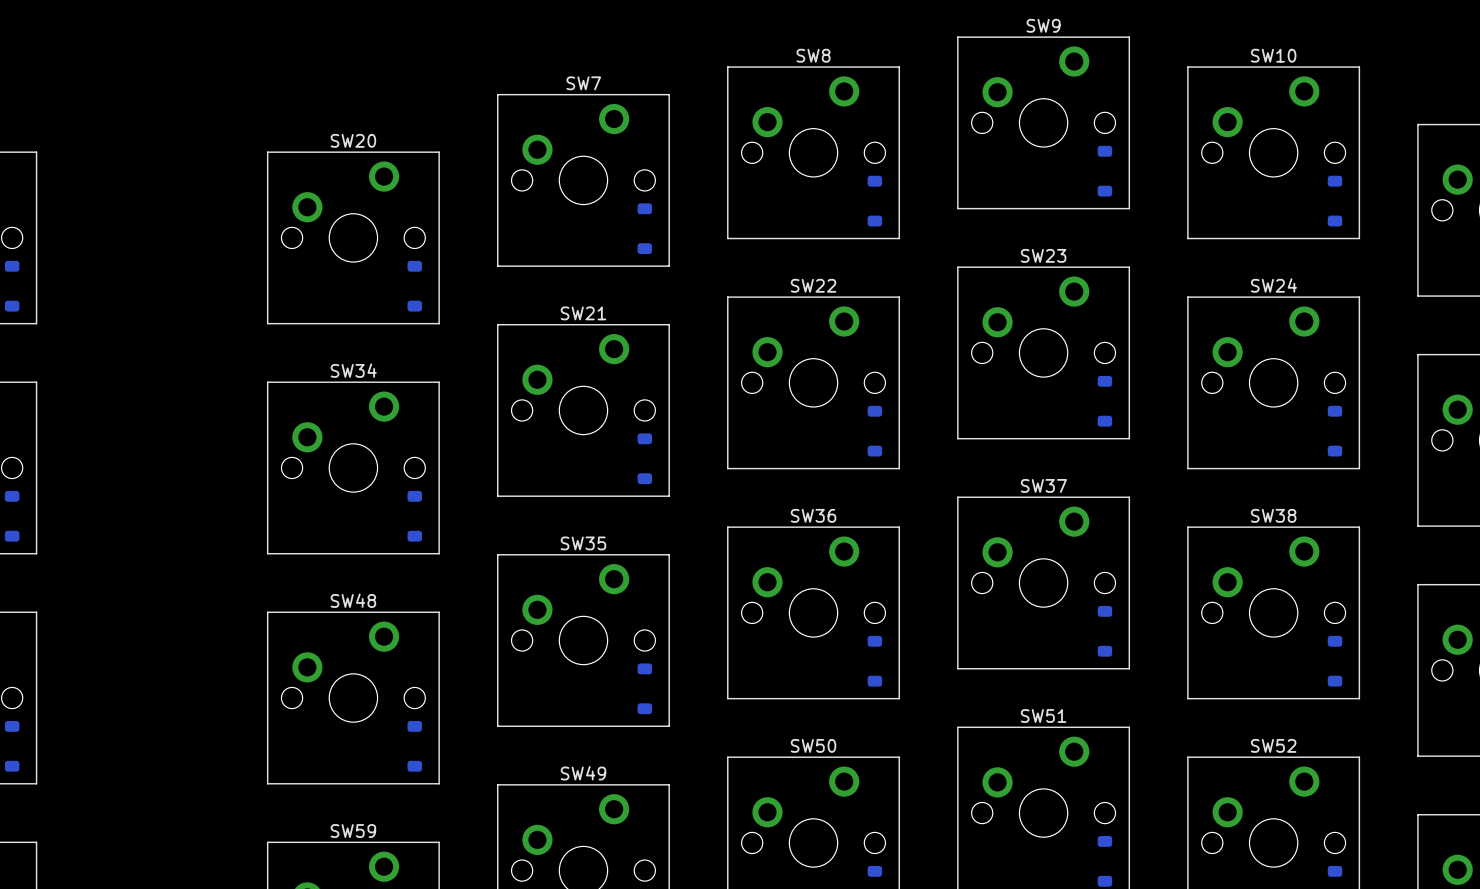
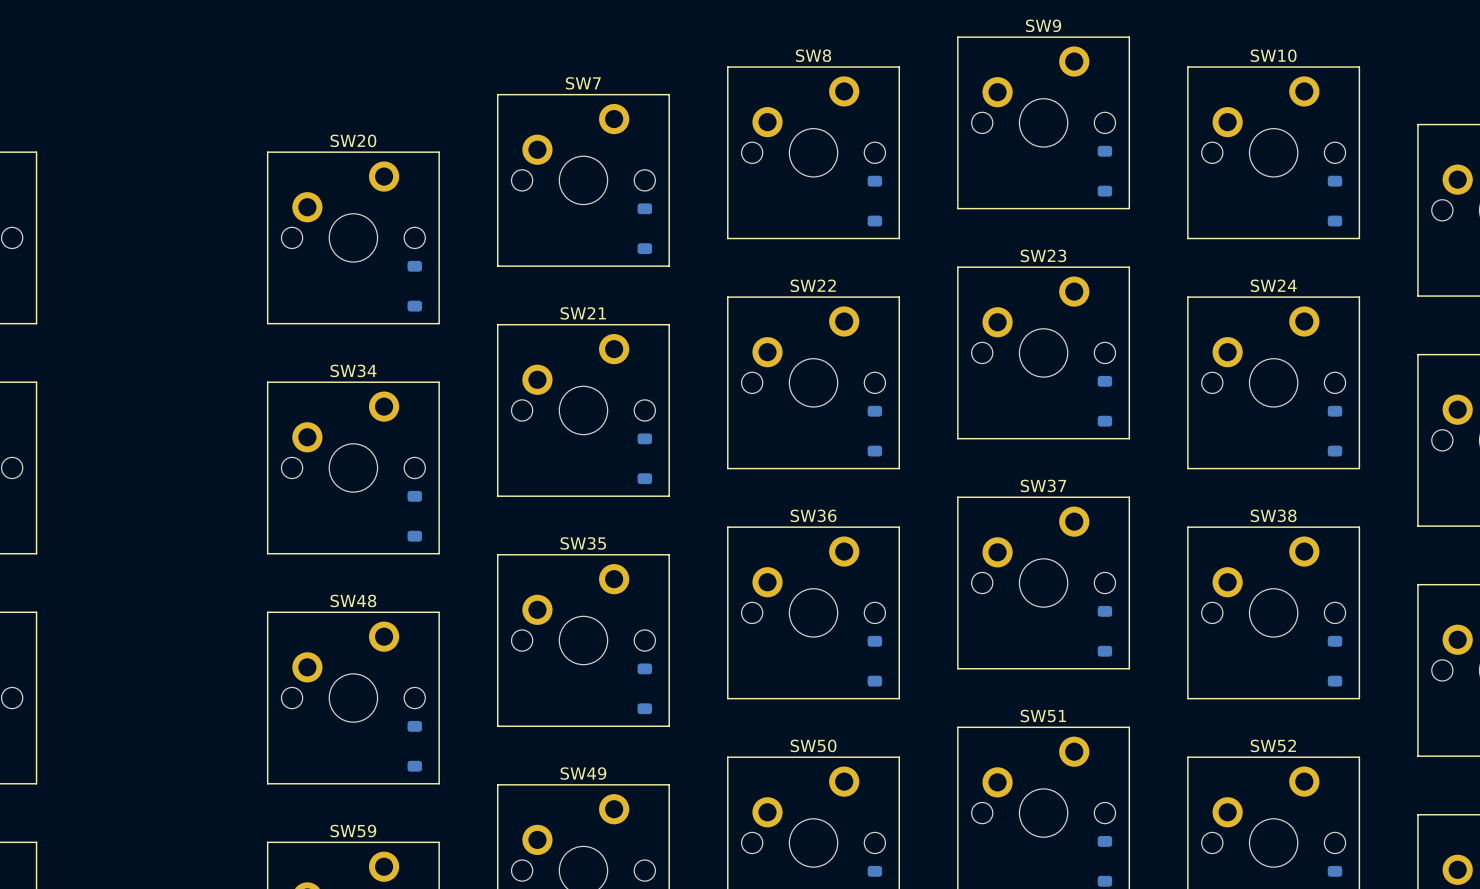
part: (12, 286) -> none
part: (12, 516) -> none
part: (12, 746) -> none

